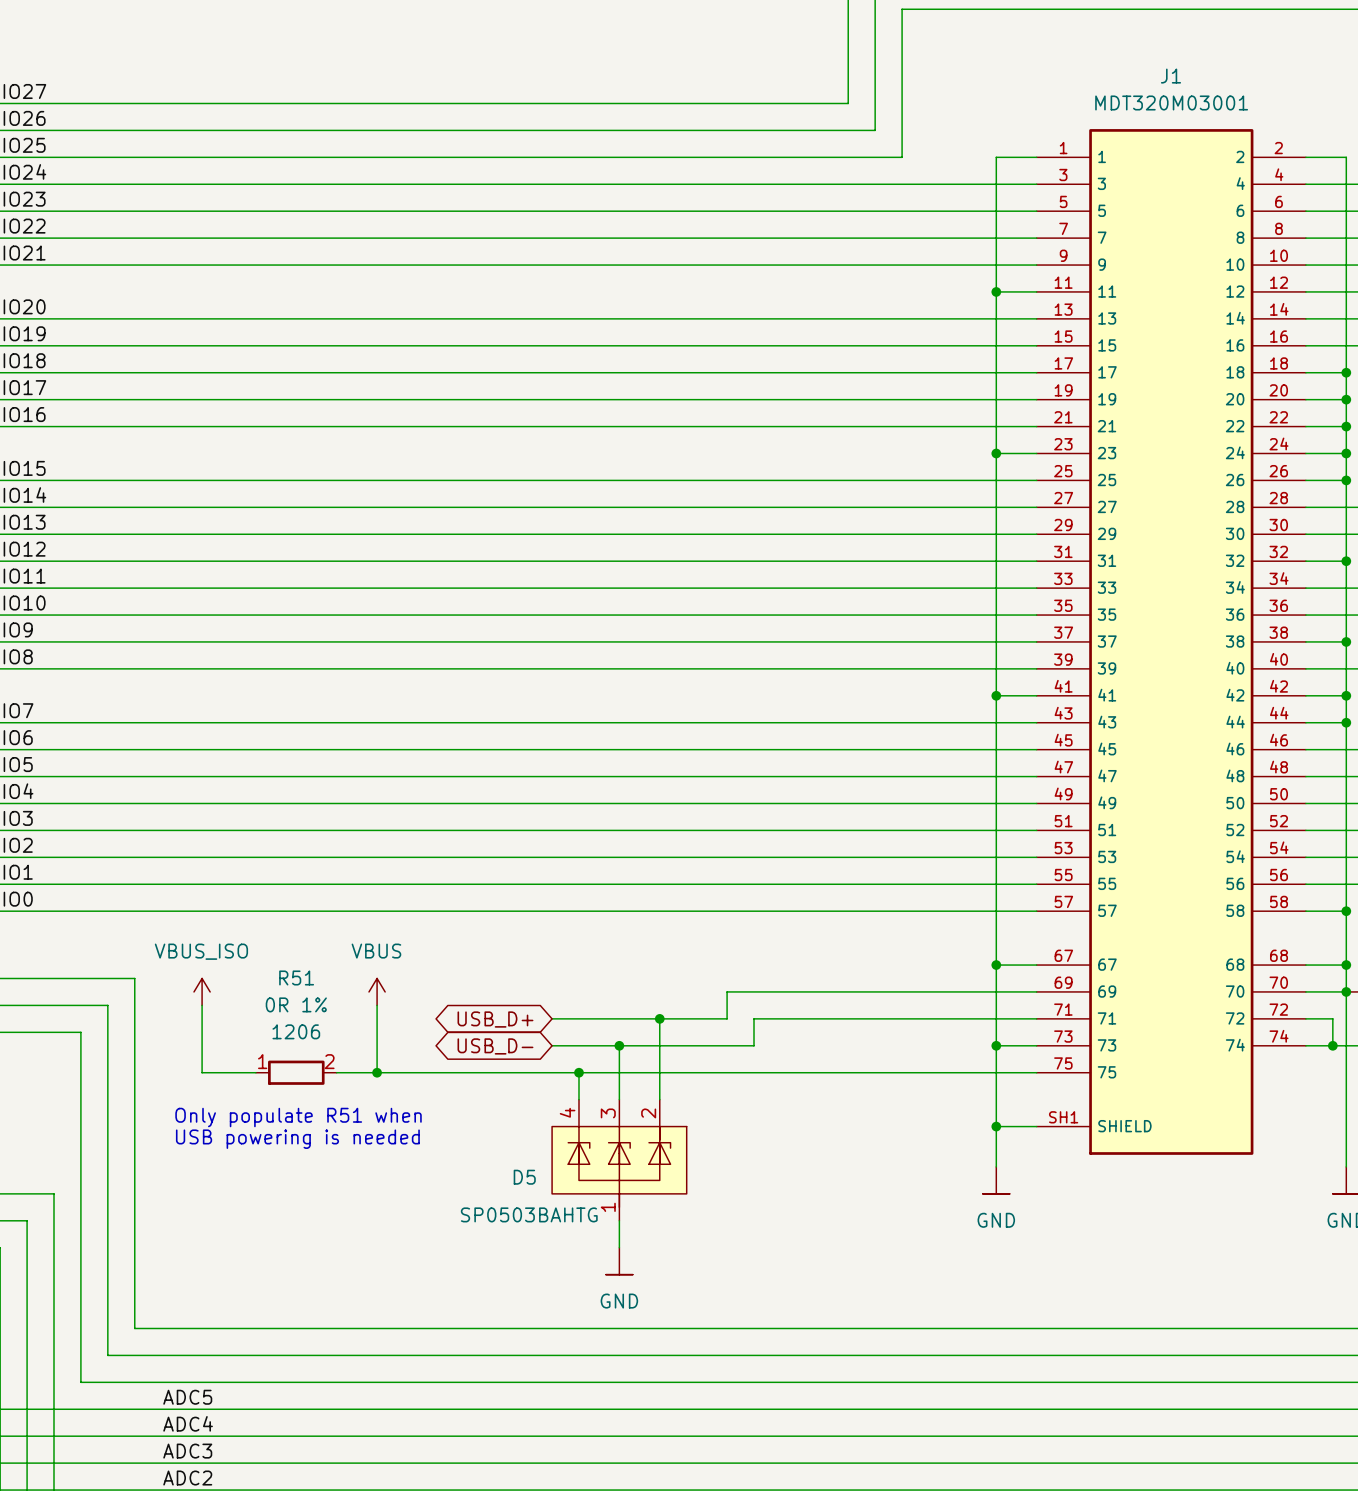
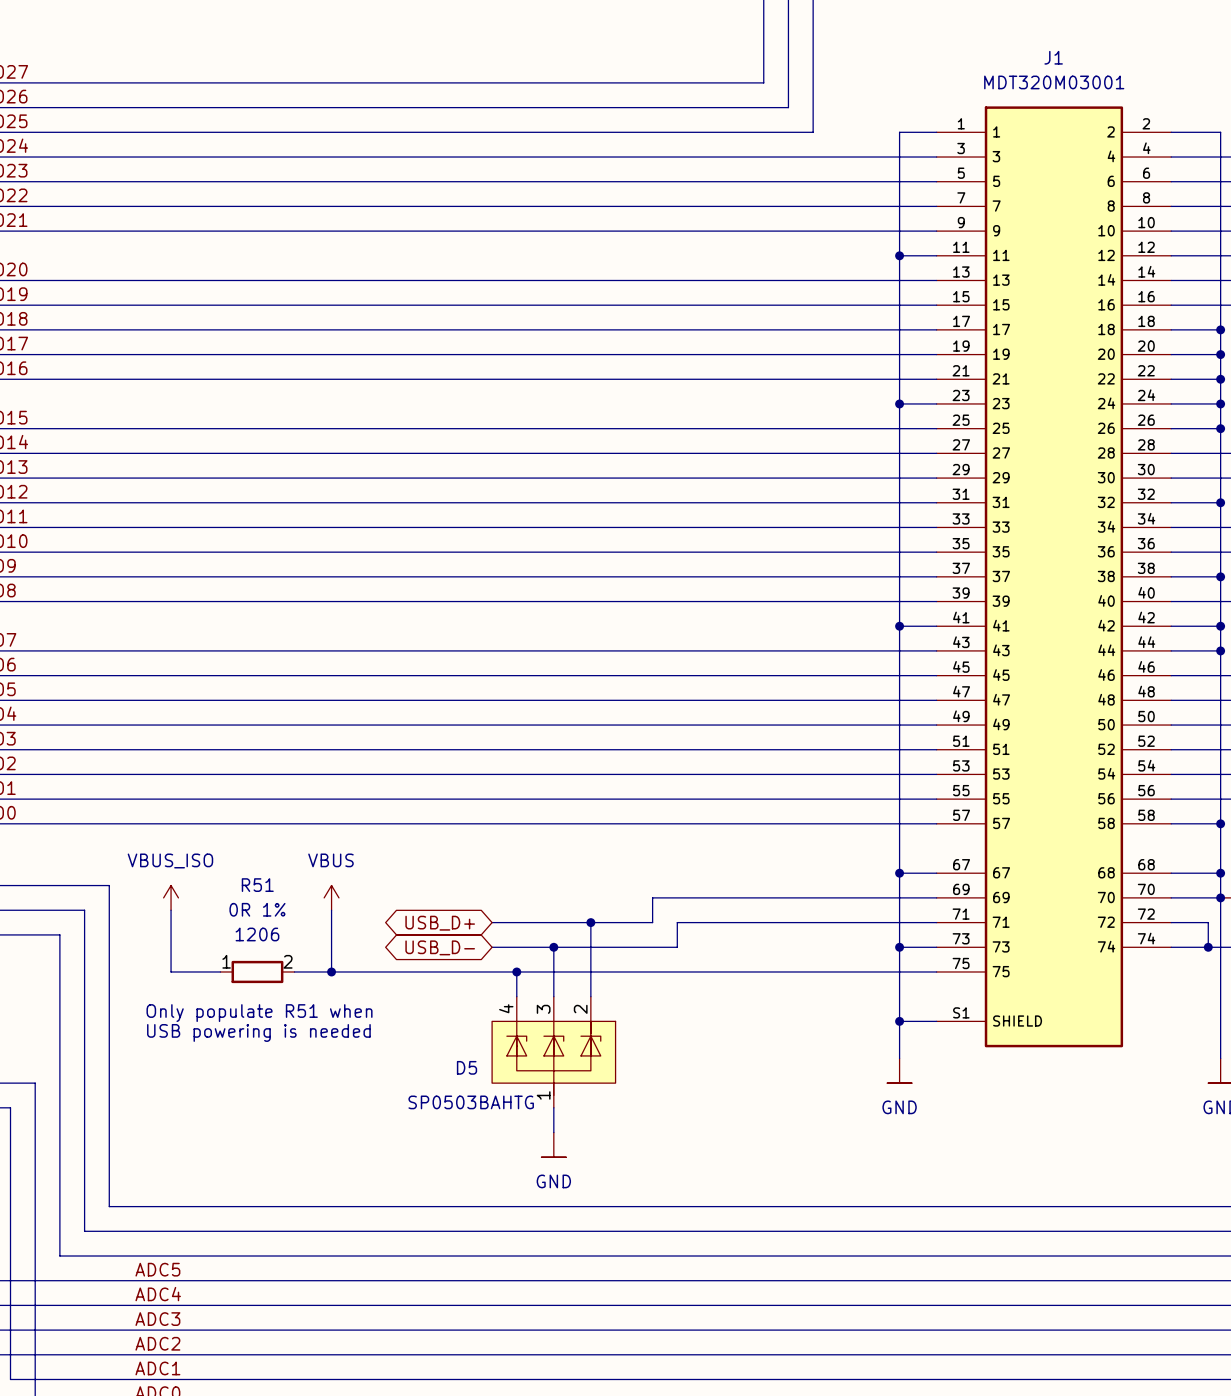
J1 symbol: [1036, 129, 1306, 1155] -> [936, 106, 1172, 1048]

